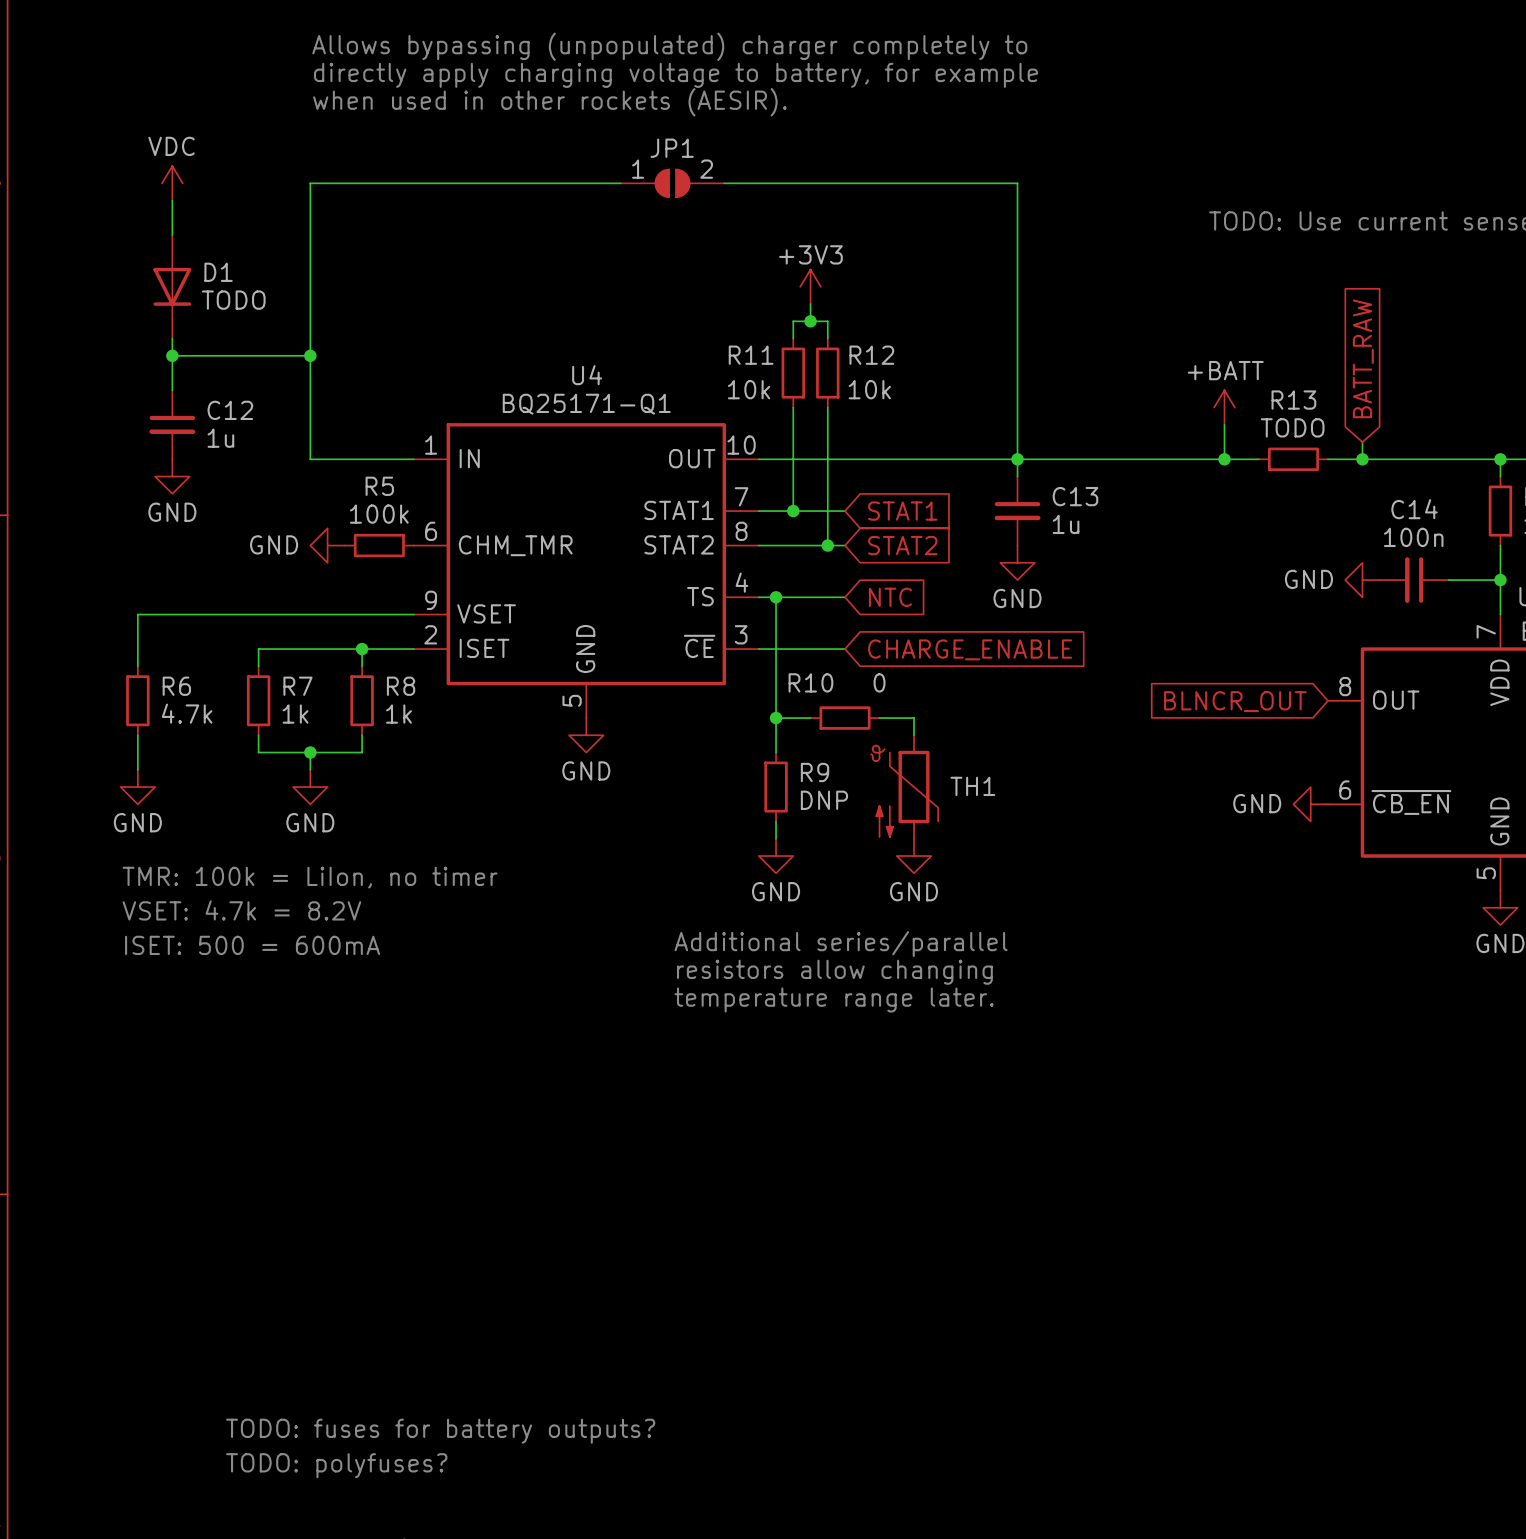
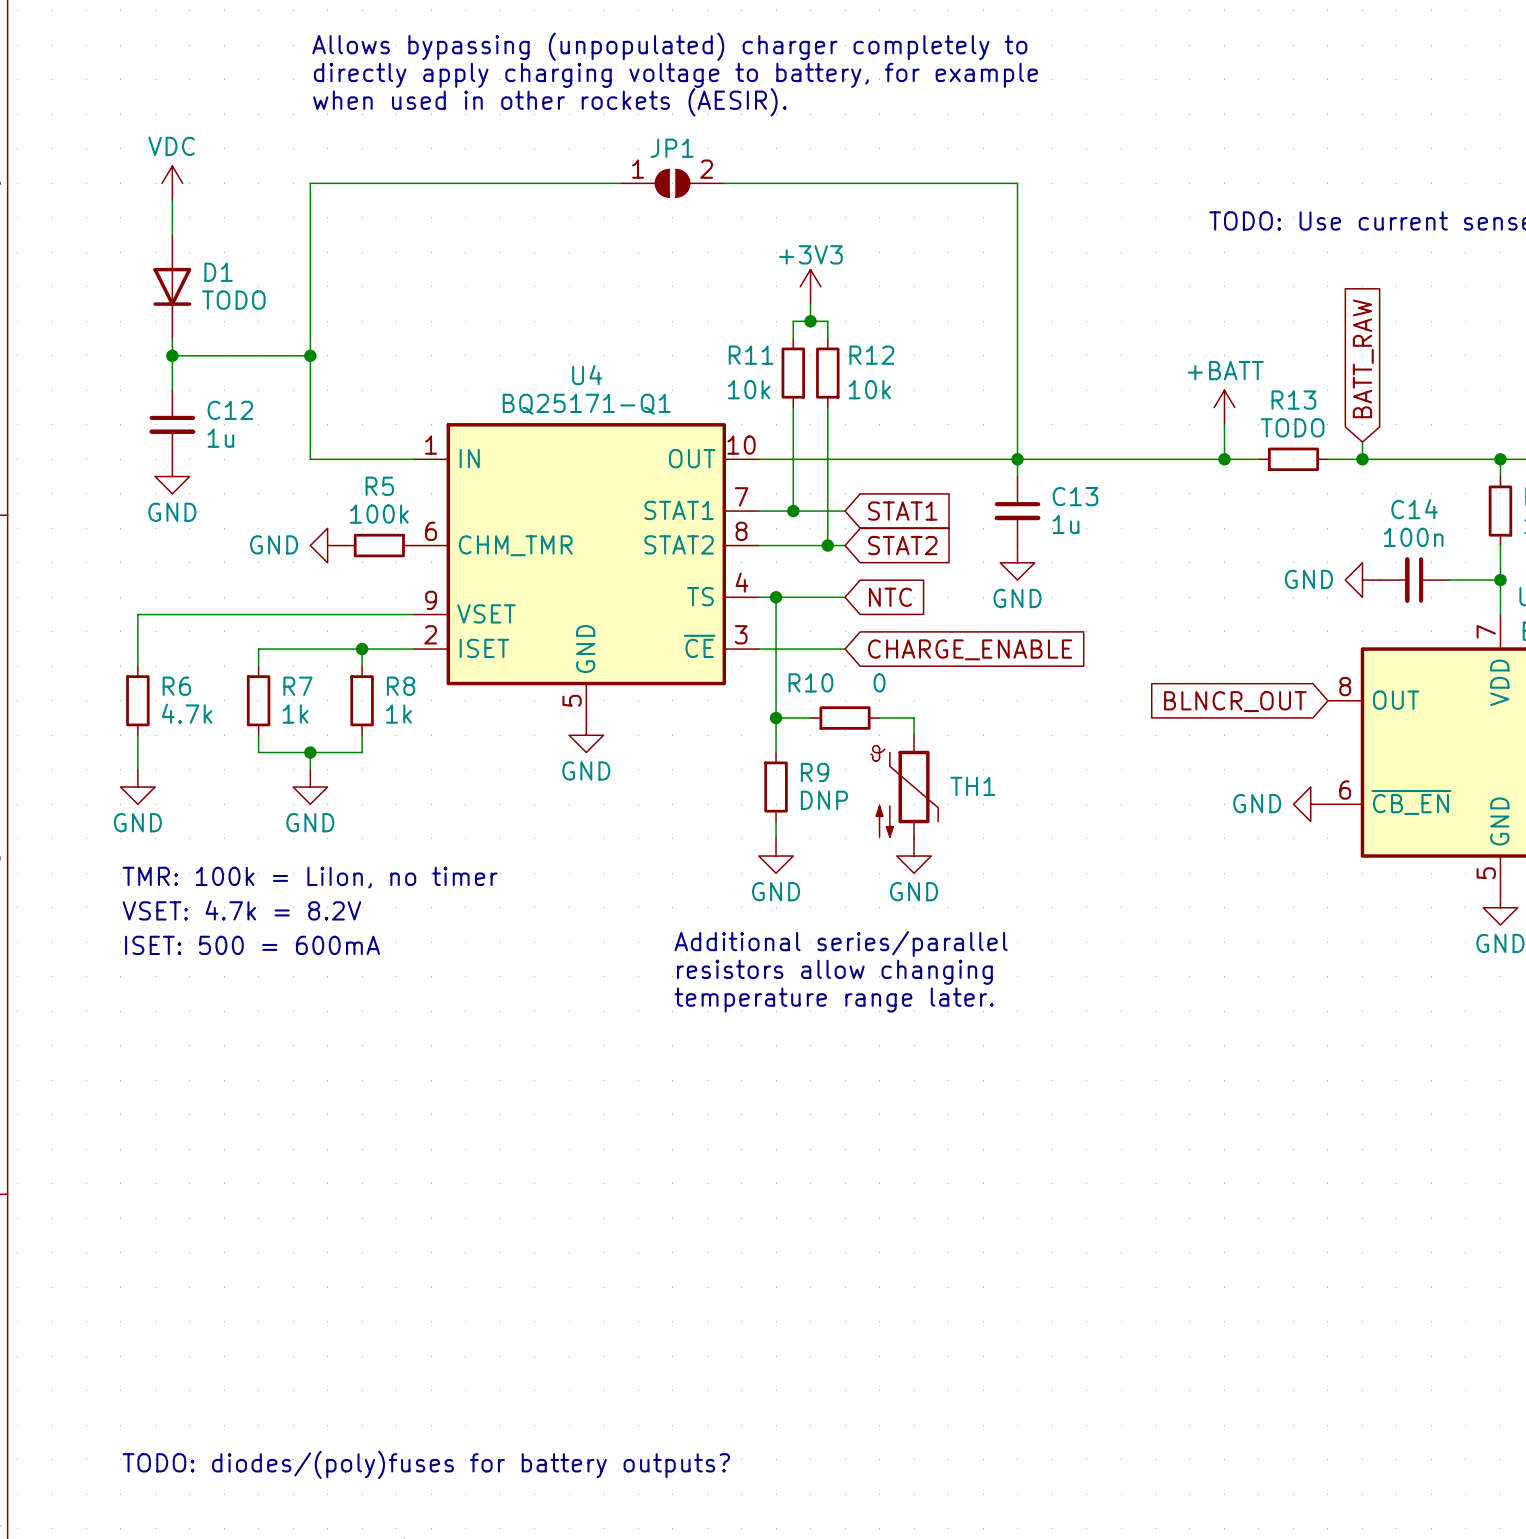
text: TODO: fuses for battery outputs? (440, 1431) -> TODO: diodes/(poly)fuses for battery outputs? (426, 1464)
text: TODO: polyfuses? (336, 1465) -> none

